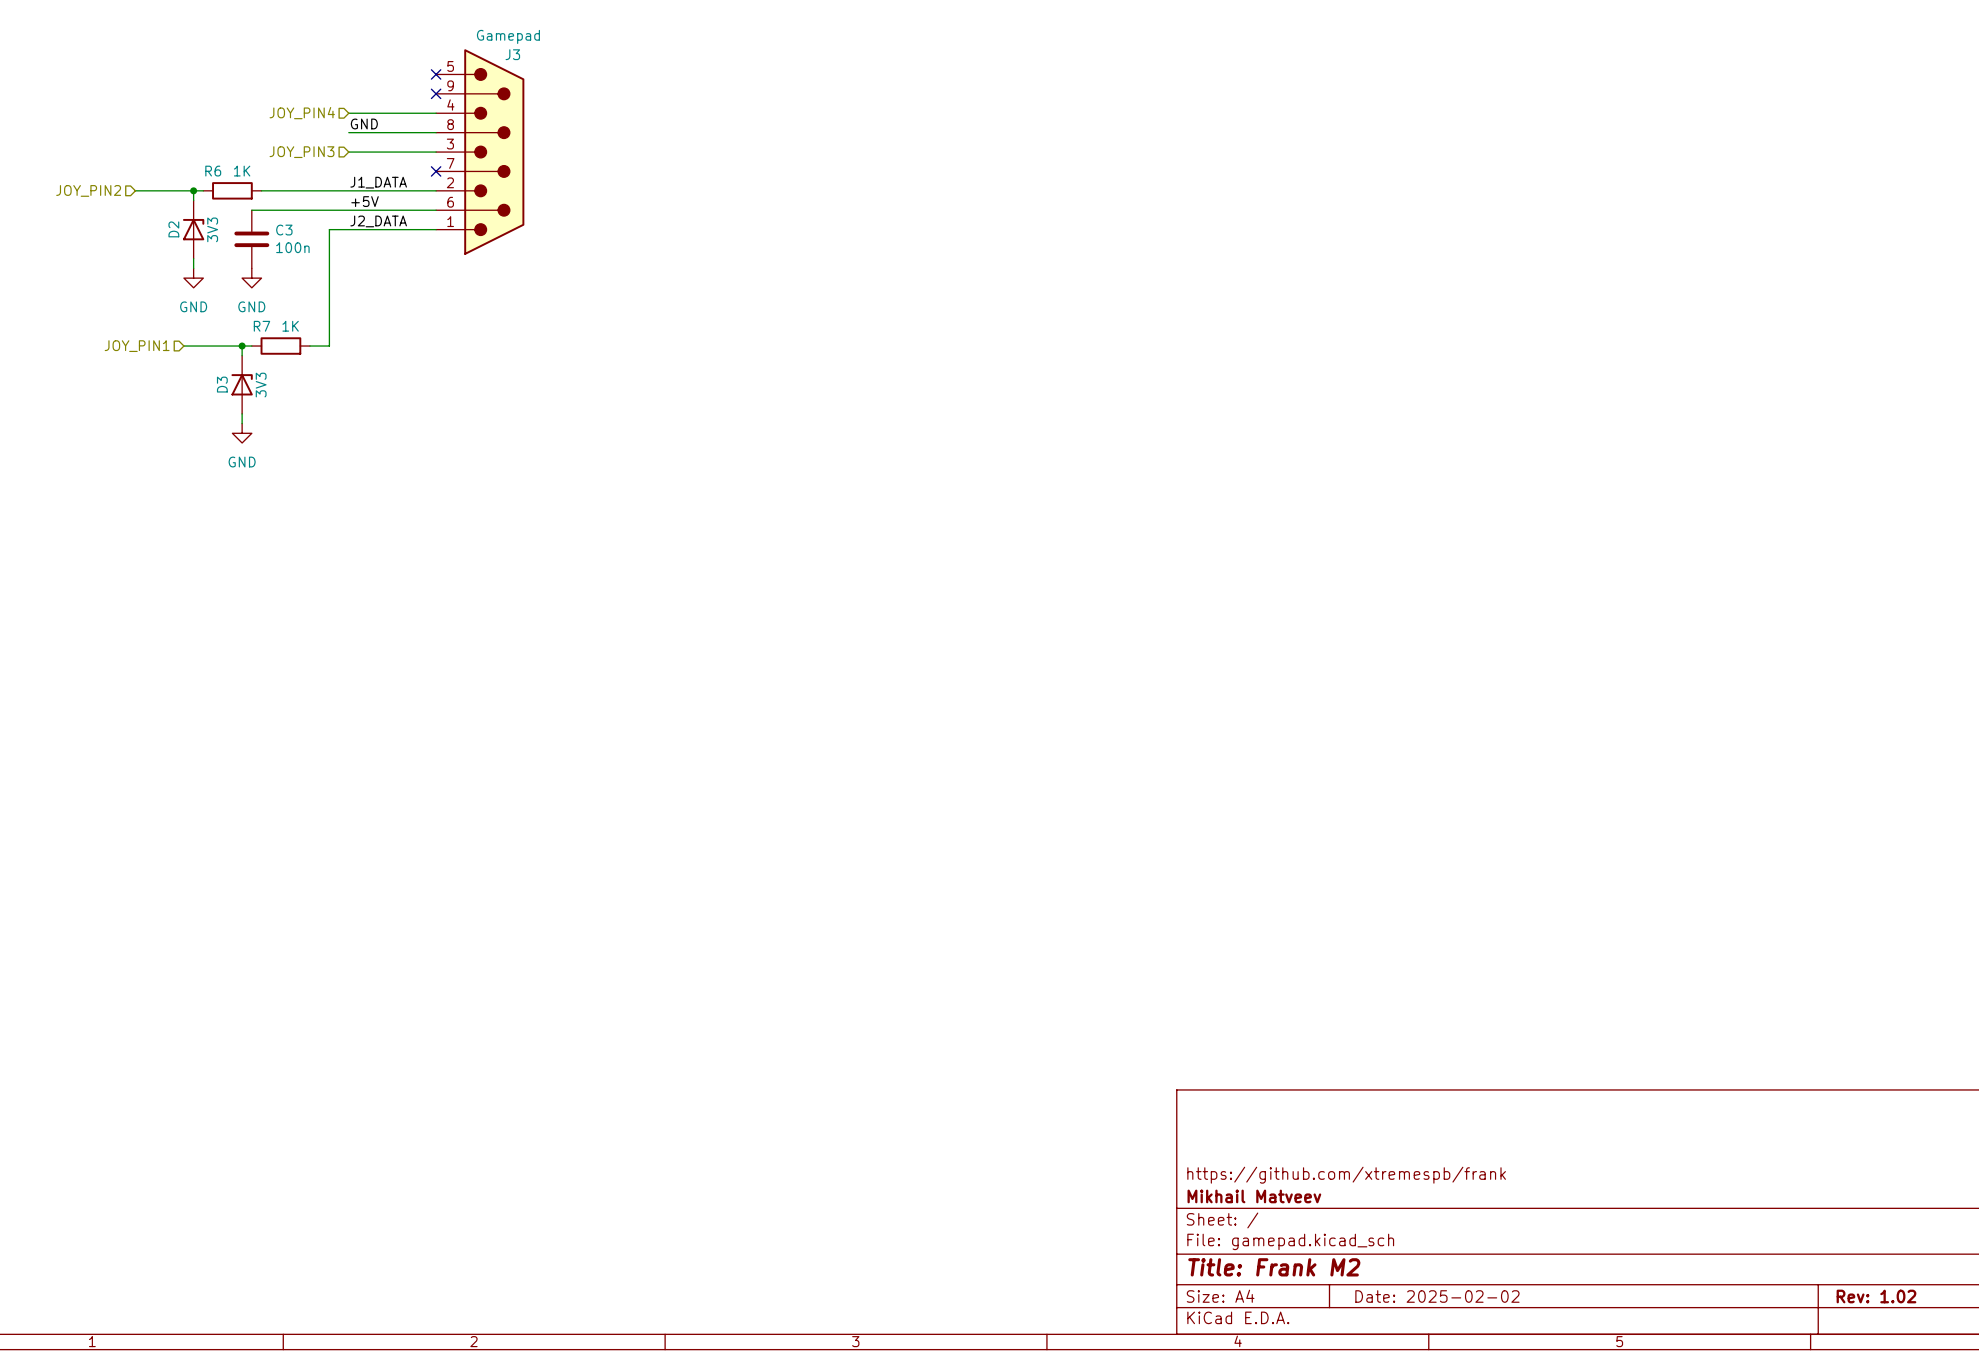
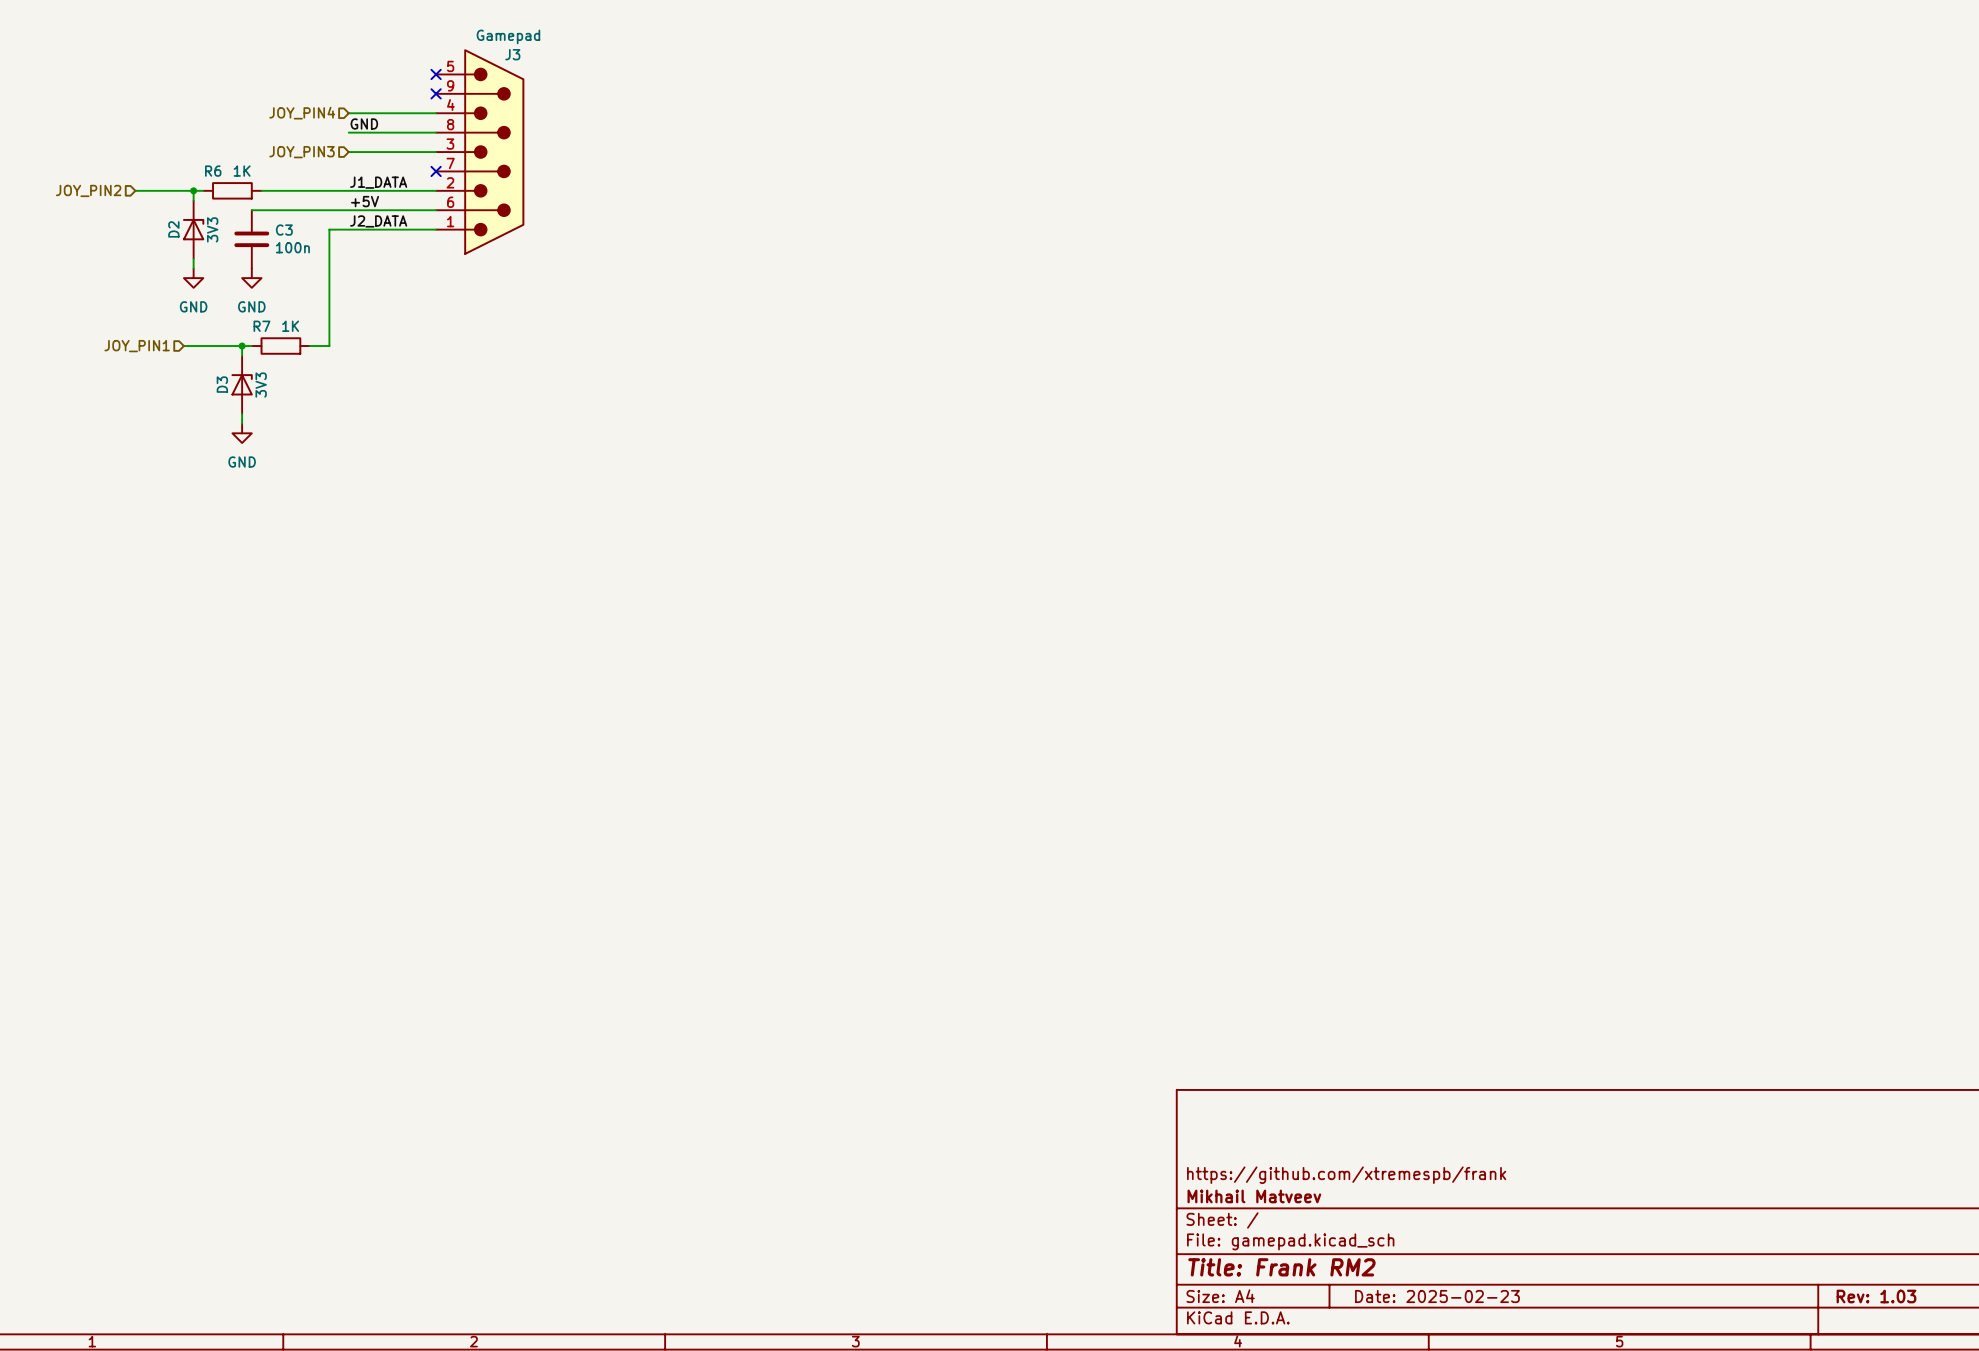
title block: Title: Frank M2 (1274, 1267) -> Title: Frank RM2 (1281, 1267)
title block: Date: 2025-02-02 (1437, 1296) -> Date: 2025-02-23 (1437, 1296)
title block: Rev: 1.02 (1876, 1296) -> Rev: 1.03 (1876, 1296)

